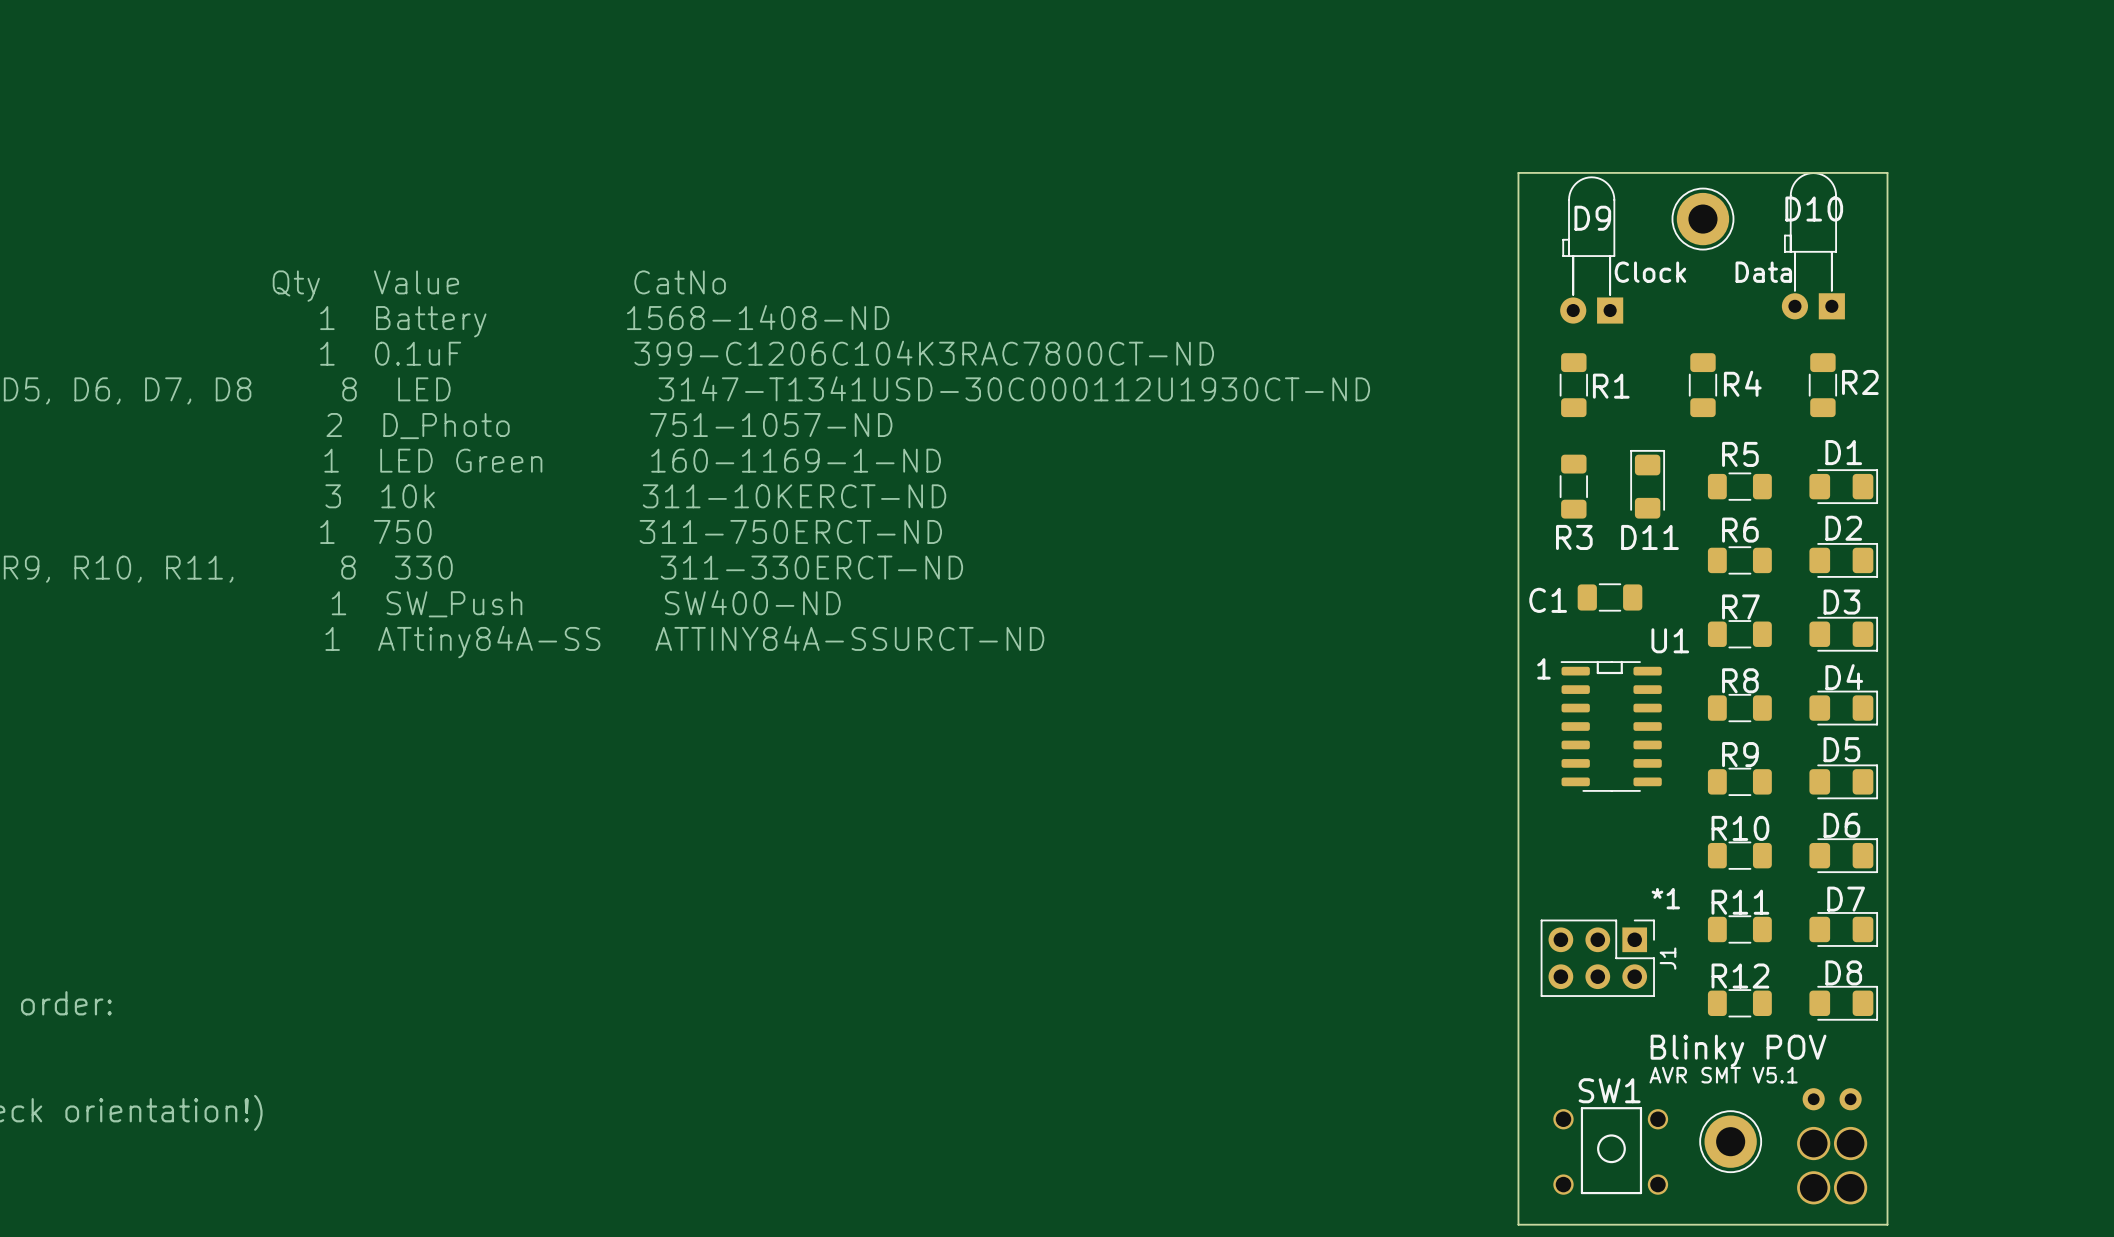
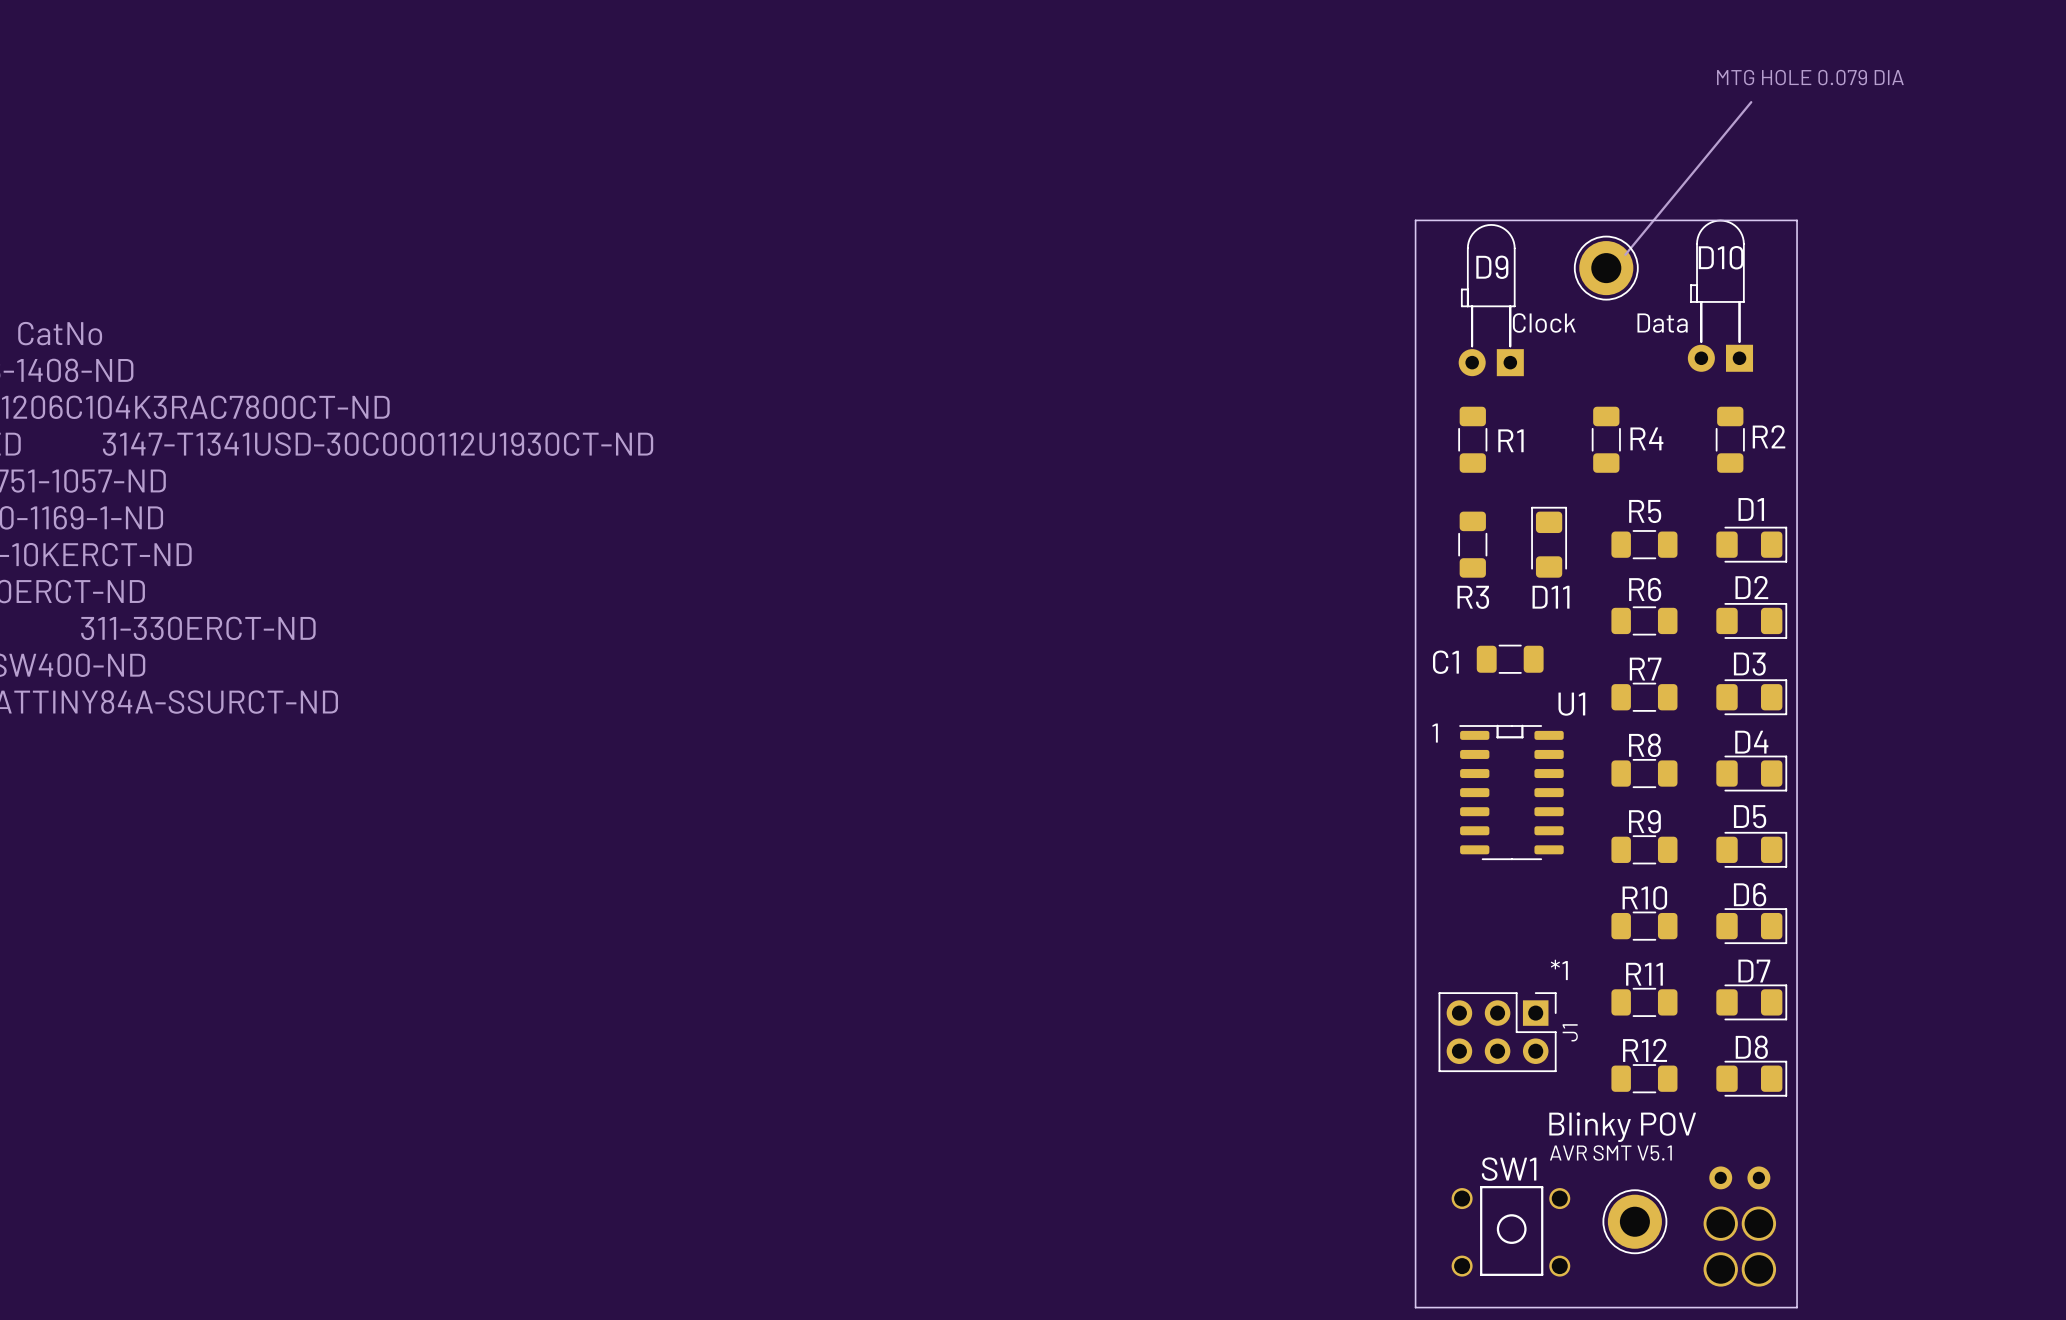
text: none -> MTG HOLE 0.079 DIA (1810, 77)
line: none -> (1751, 102) (1625, 254)

